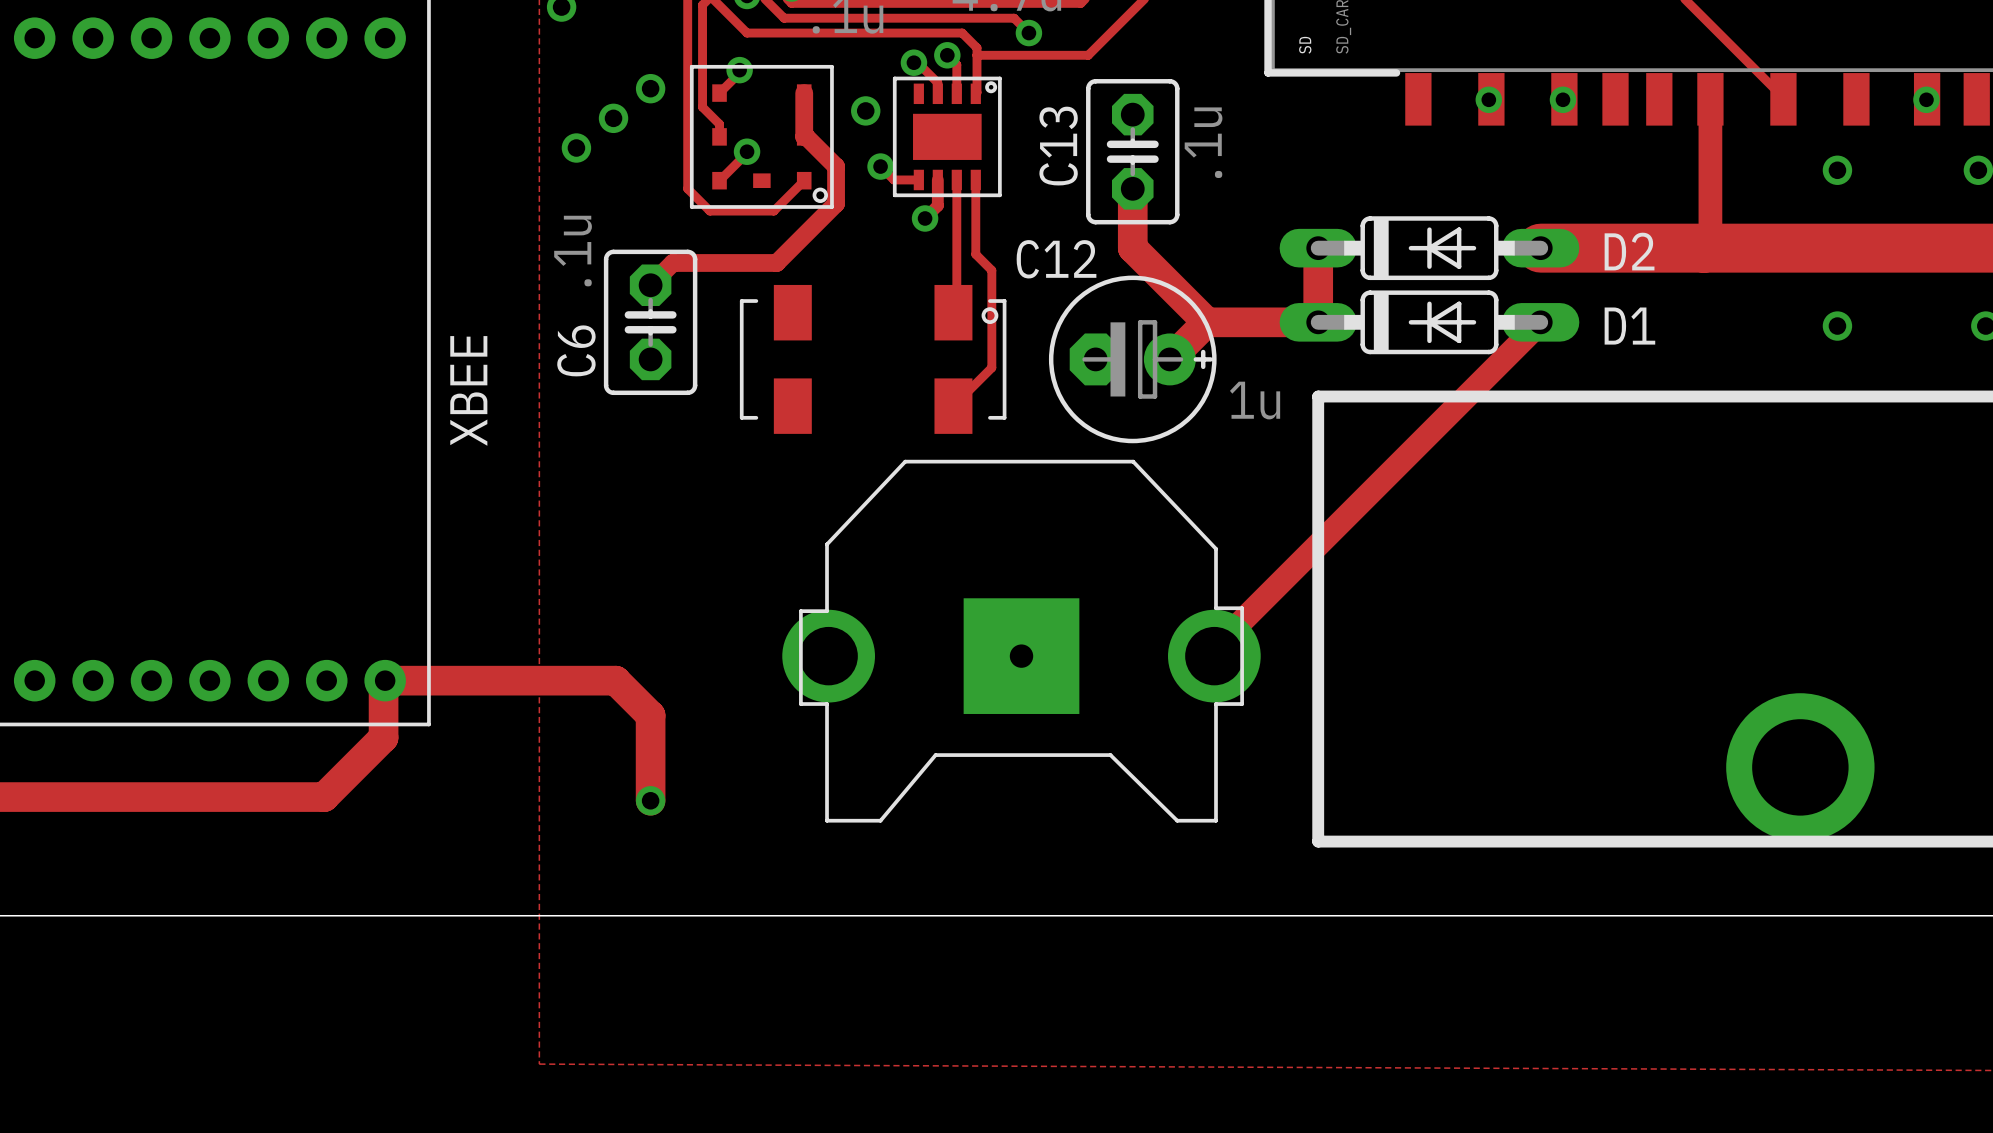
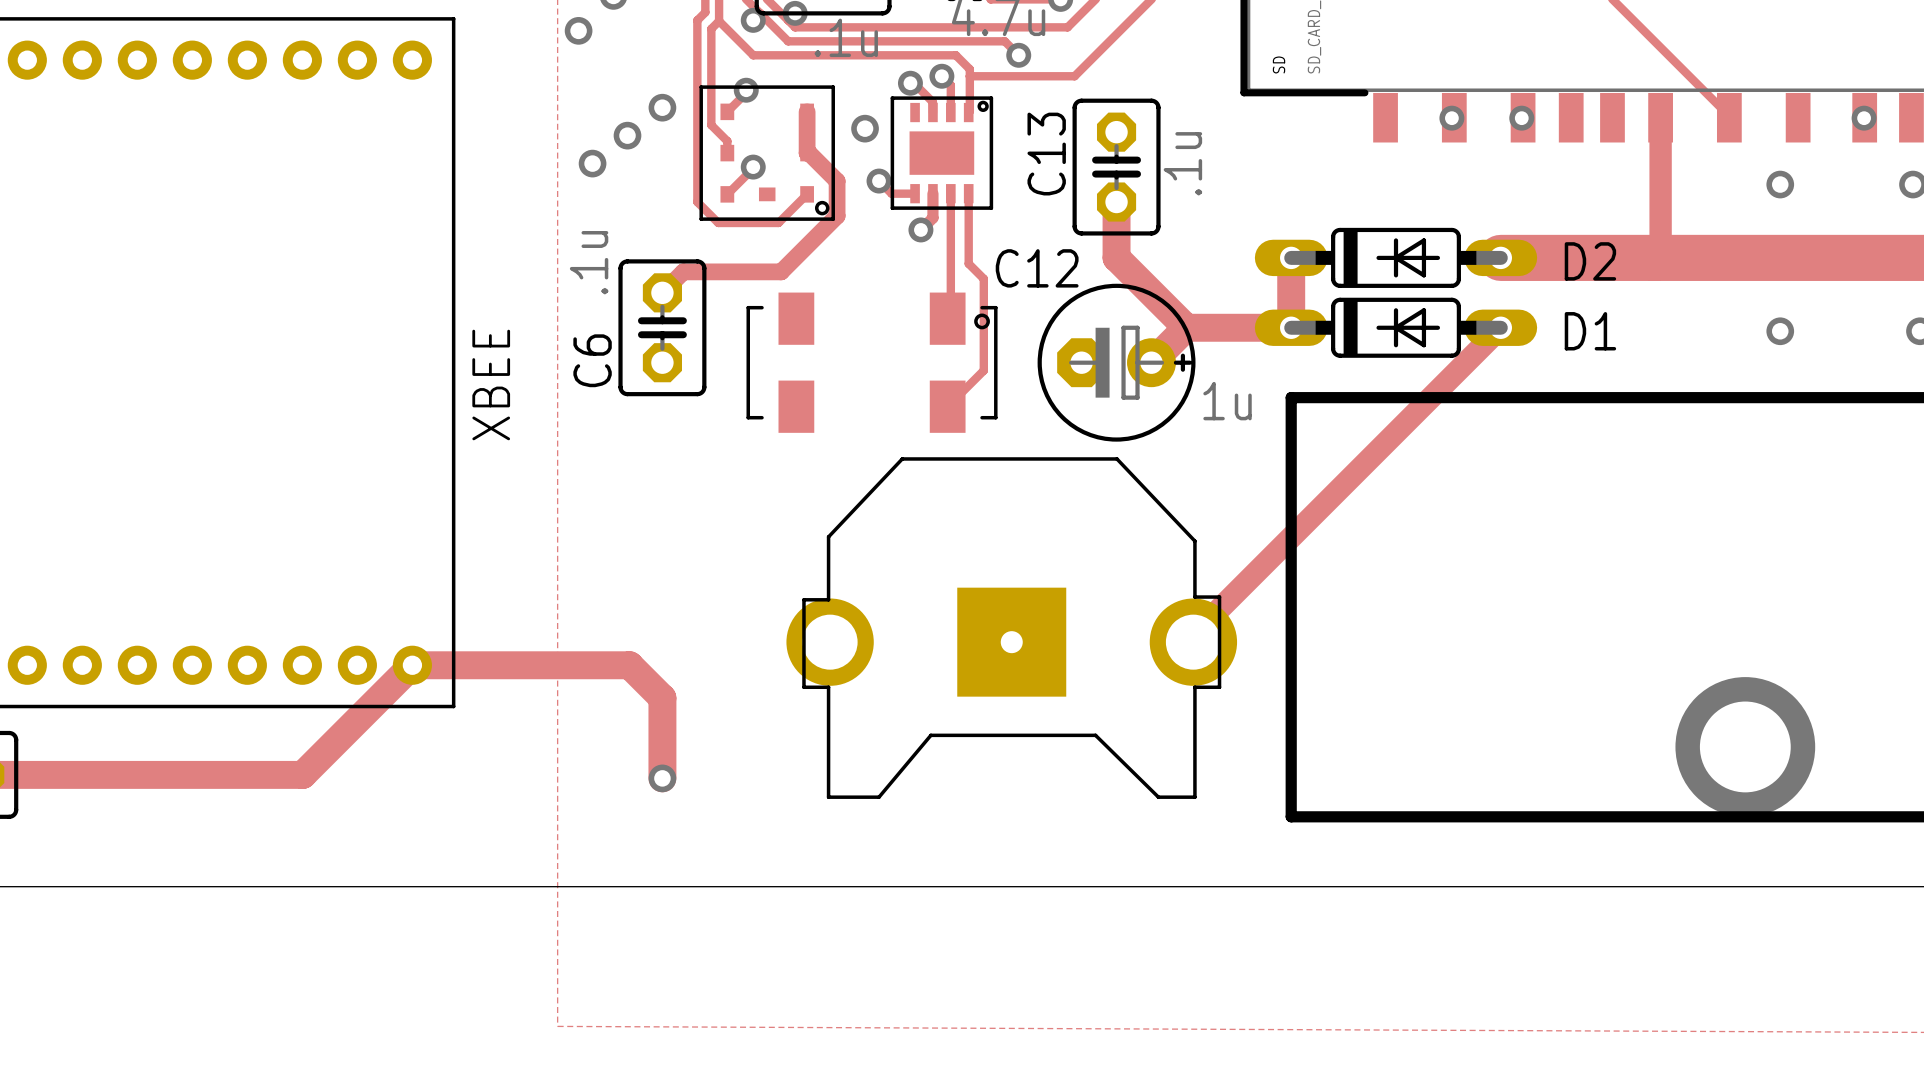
track: (383, 682) (383, 737) (324, 797) (268, 797) -> (410, 666) (302, 774)

